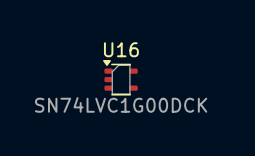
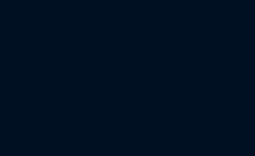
U16: SN74LVC1G00DCK (120, 77) -> none

